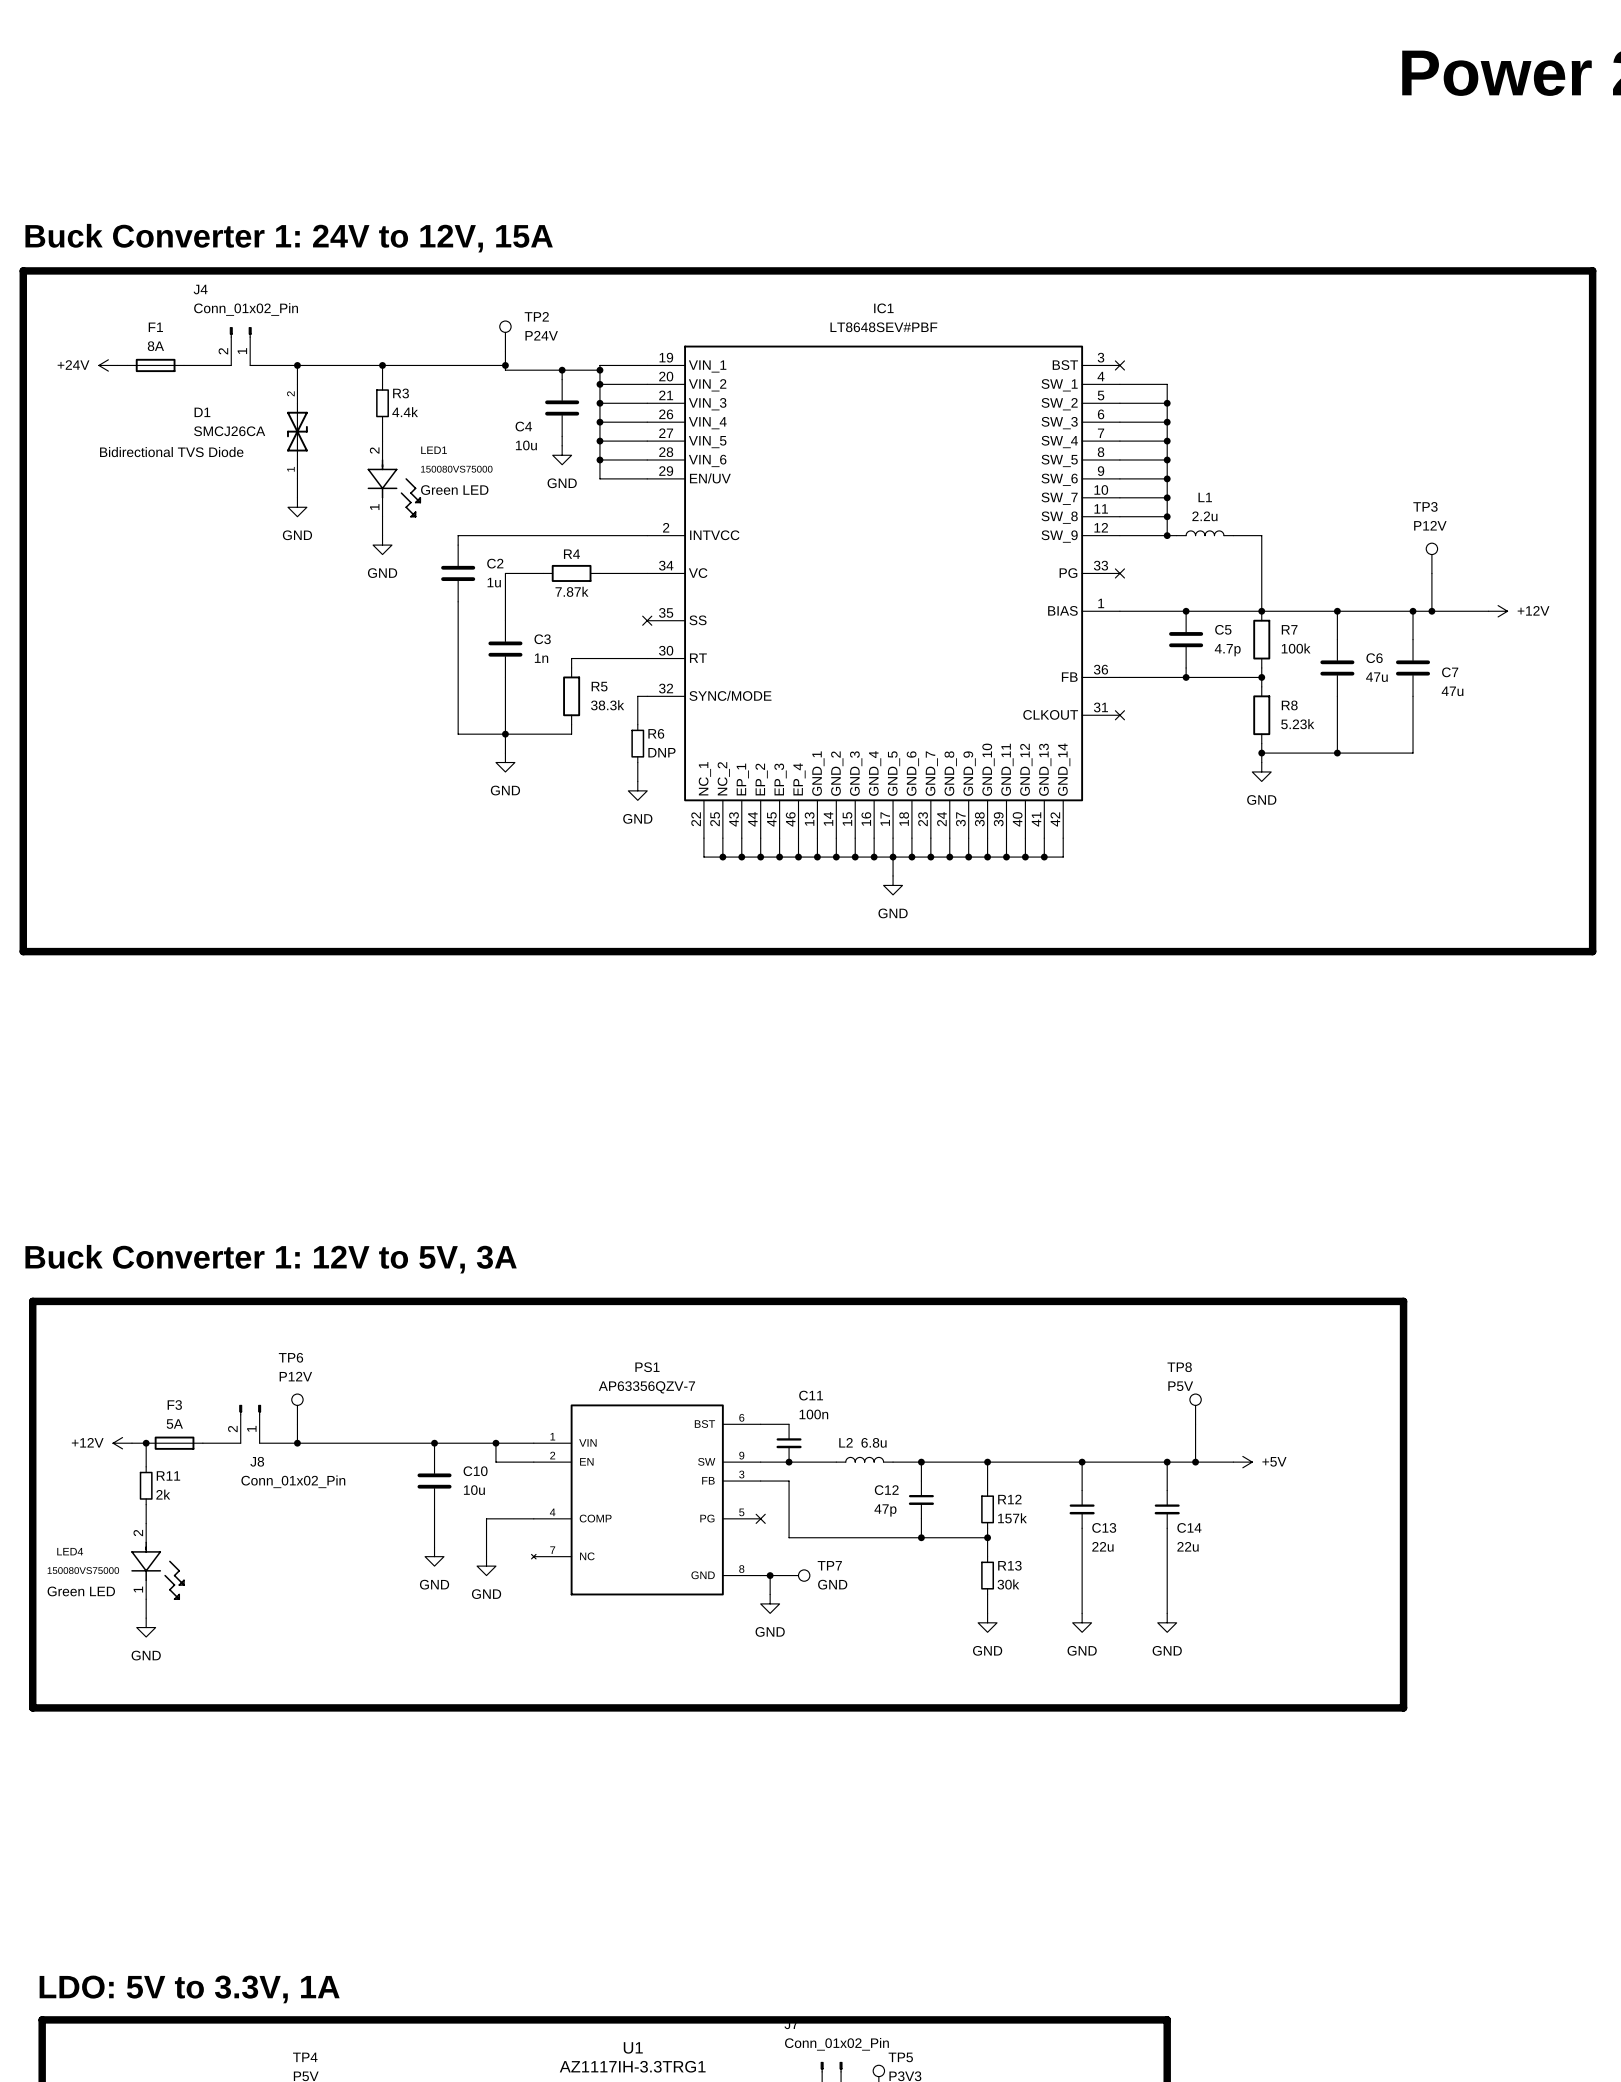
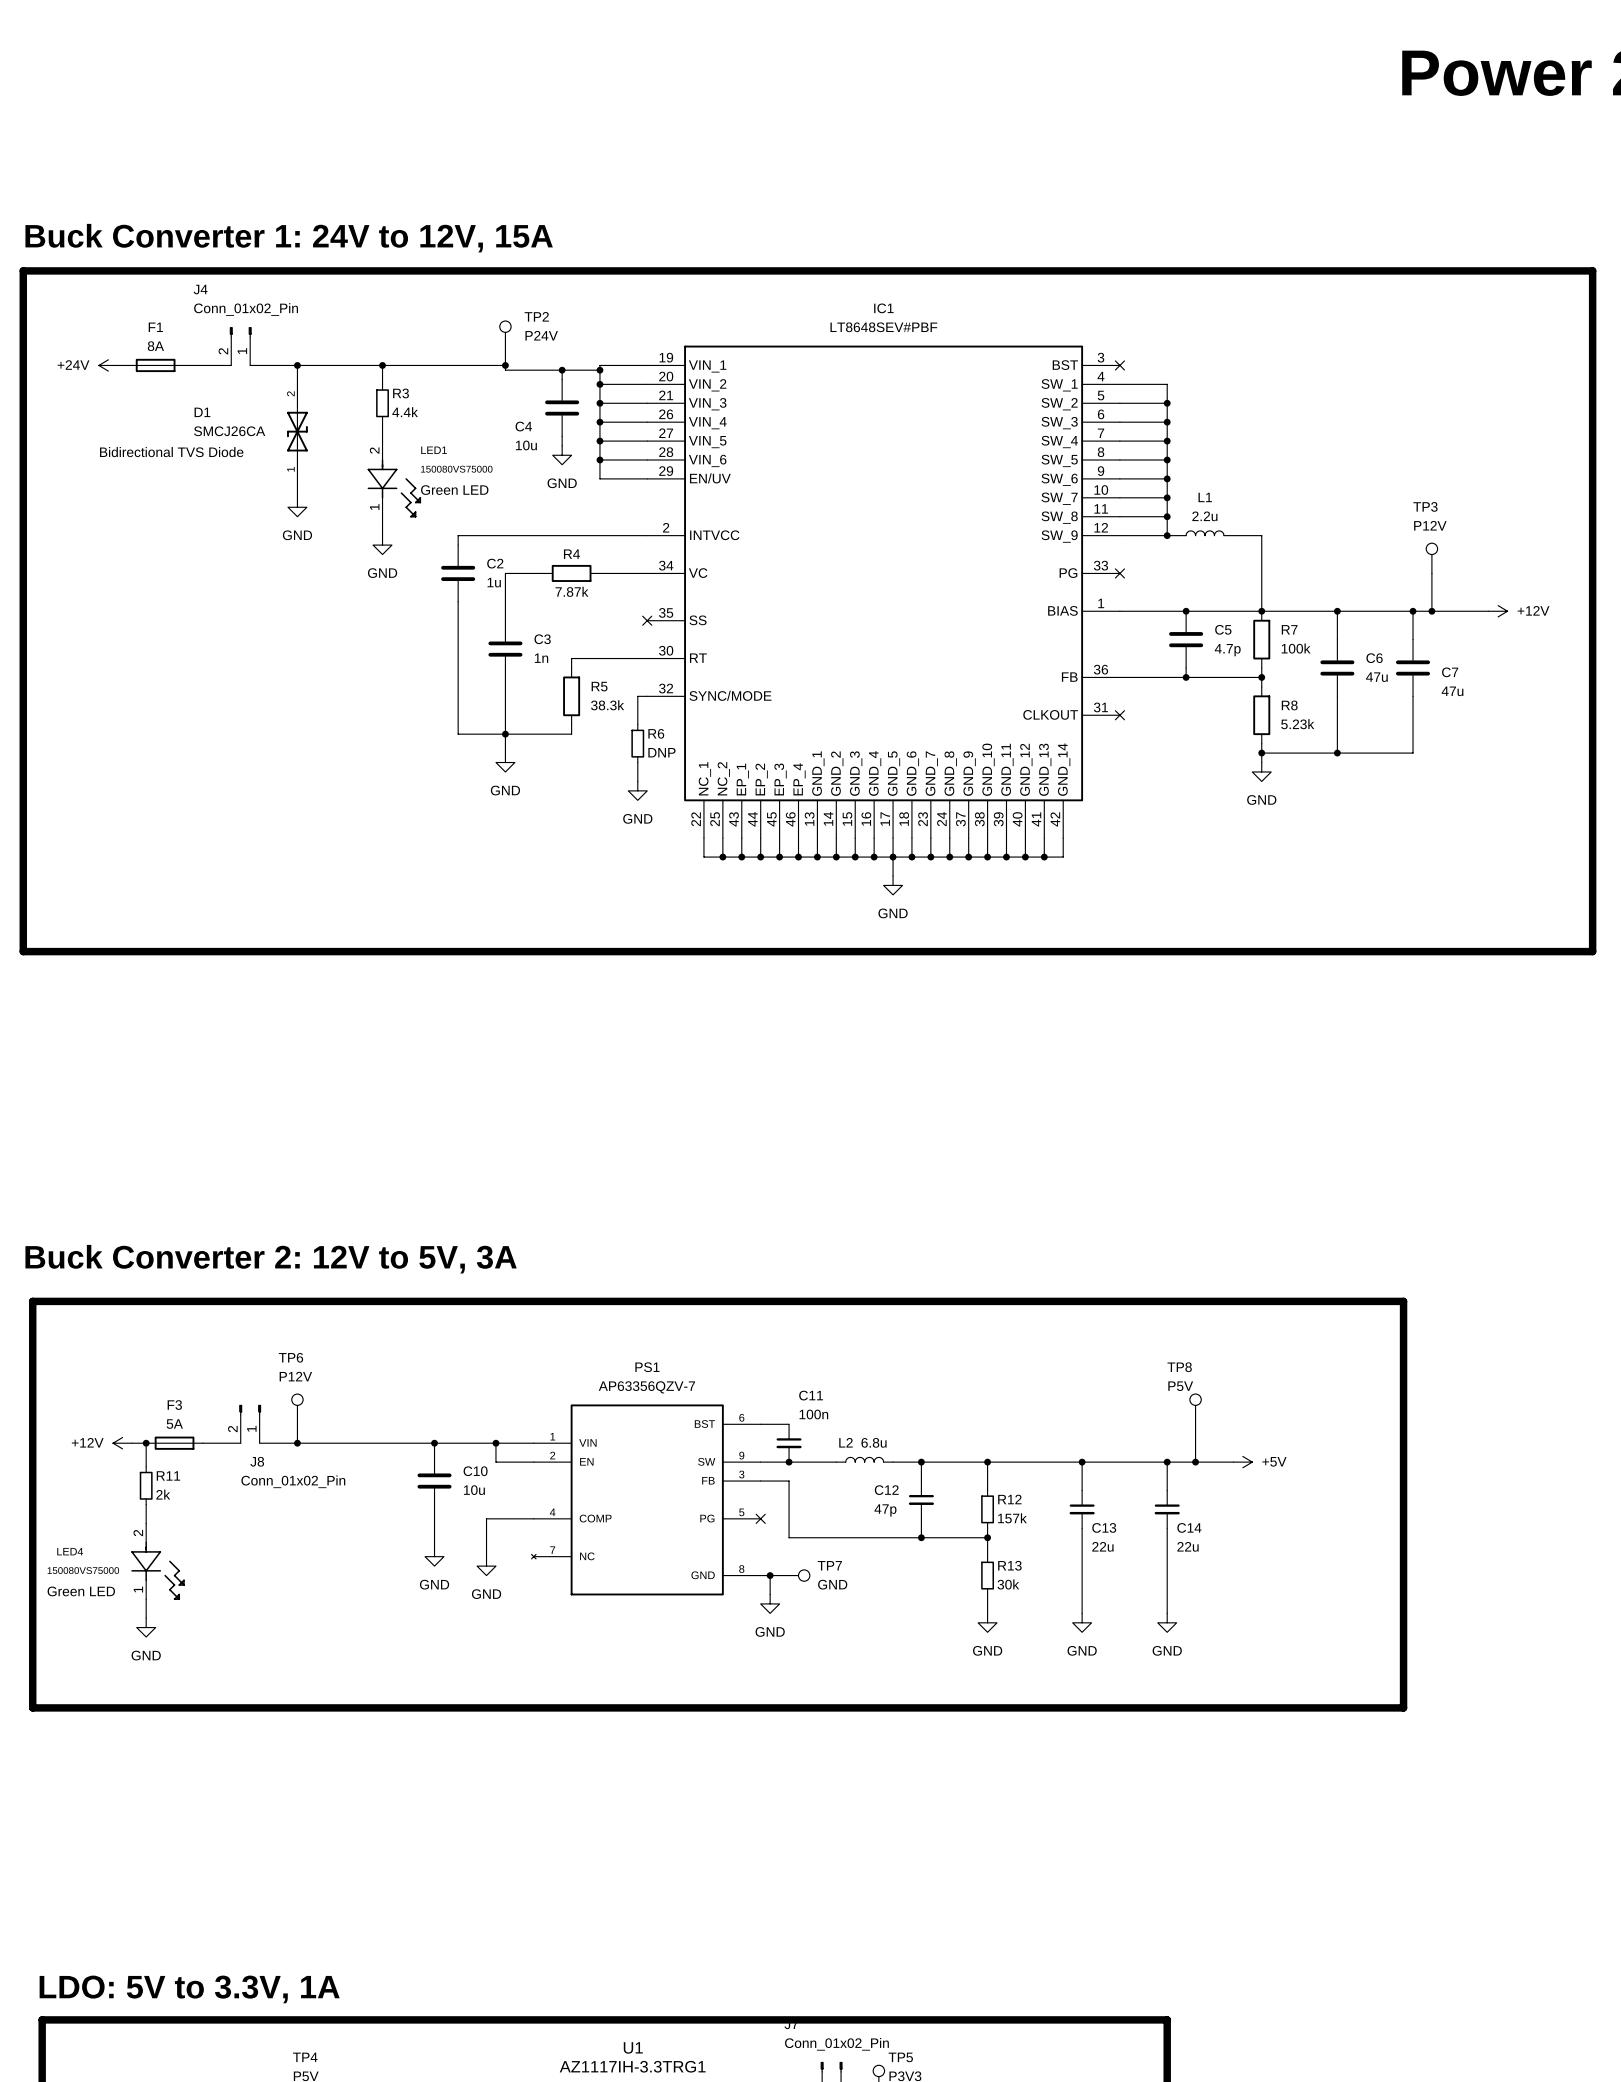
text: Buck Converter 1: 12V to 5V, 3A (271, 1259) -> Buck Converter 2: 12V to 5V, 3A (271, 1259)

